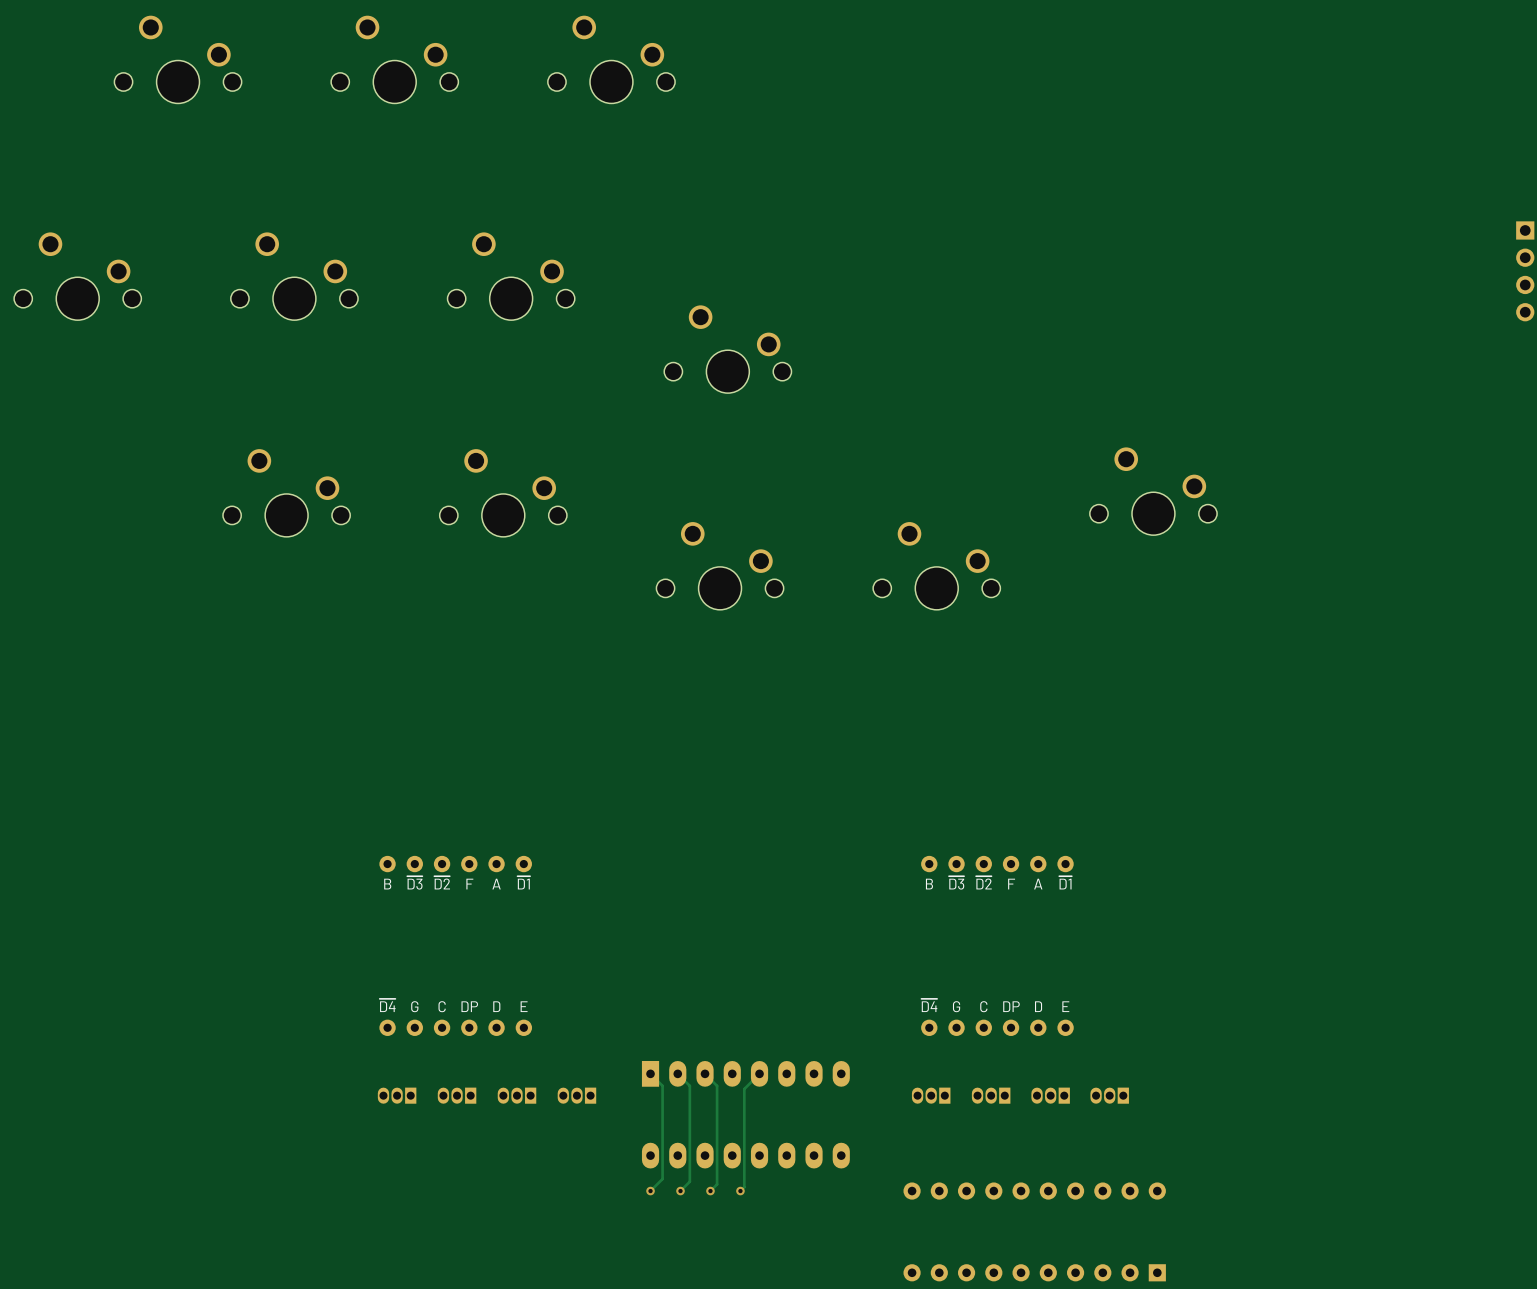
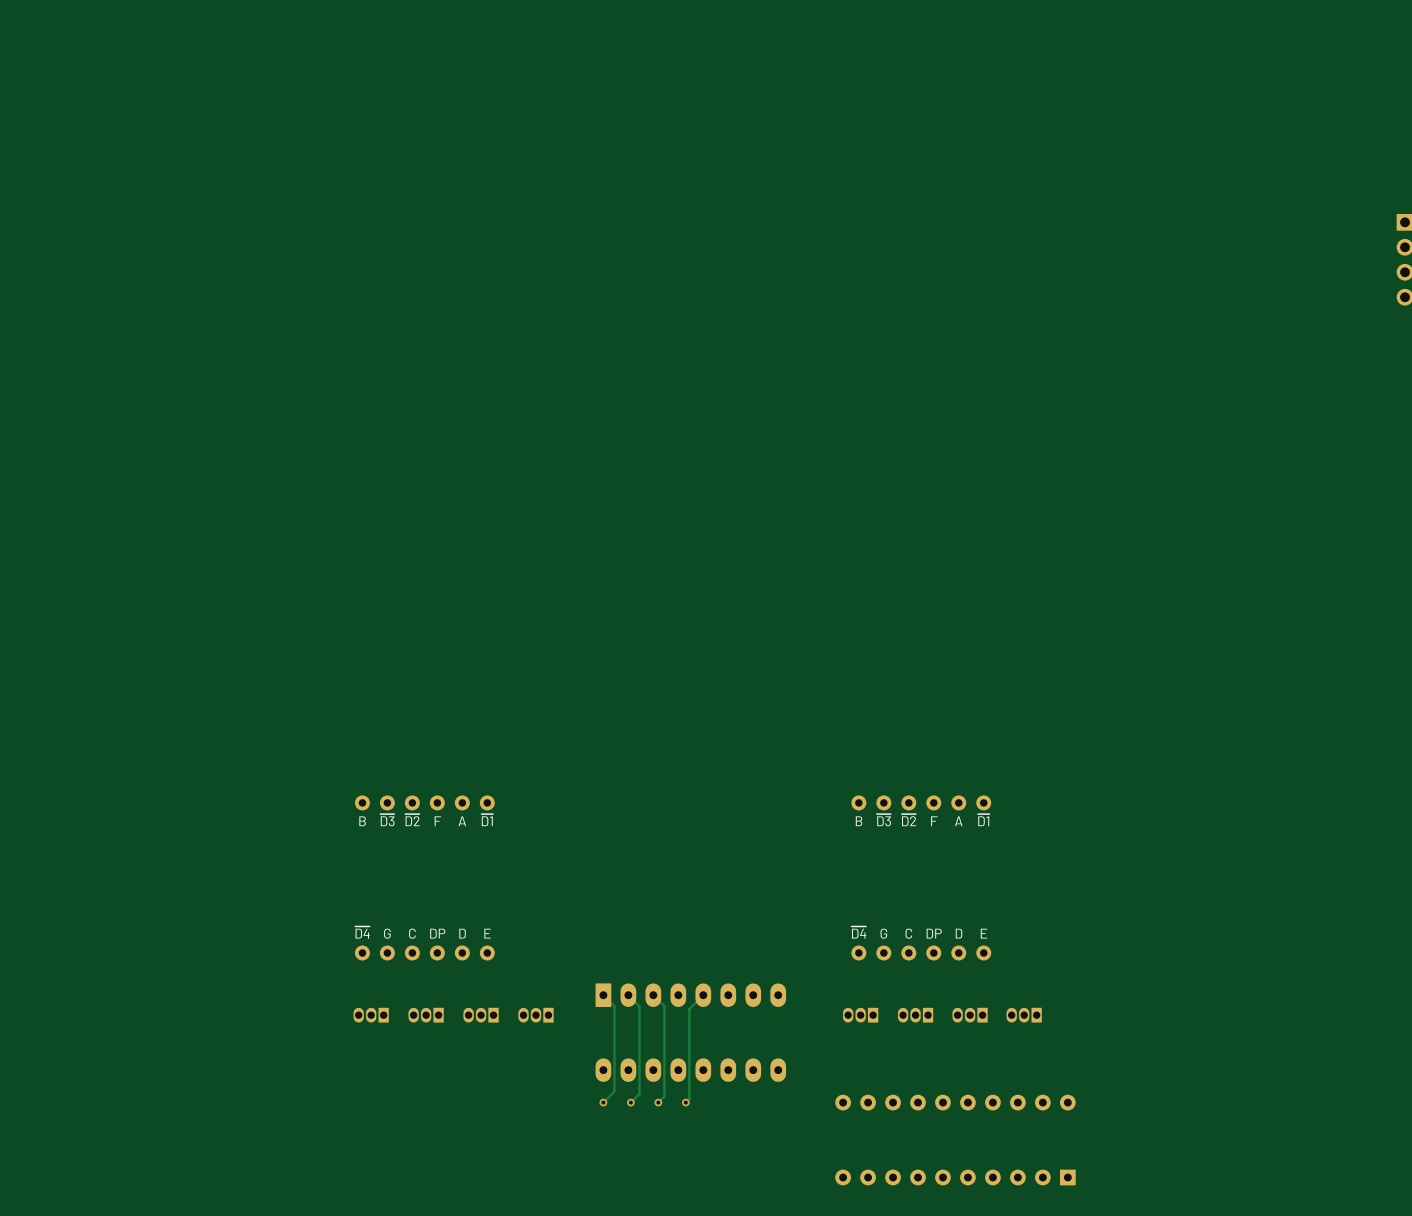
part: (178, 59) -> none
part: (394, 59) -> none
part: (611, 59) -> none
part: (77, 276) -> none
part: (294, 276) -> none
part: (511, 276) -> none
part: (727, 349) -> none
part: (1153, 491) -> none
part: (286, 492) -> none
part: (503, 492) -> none
part: (720, 565) -> none
part: (936, 565) -> none

